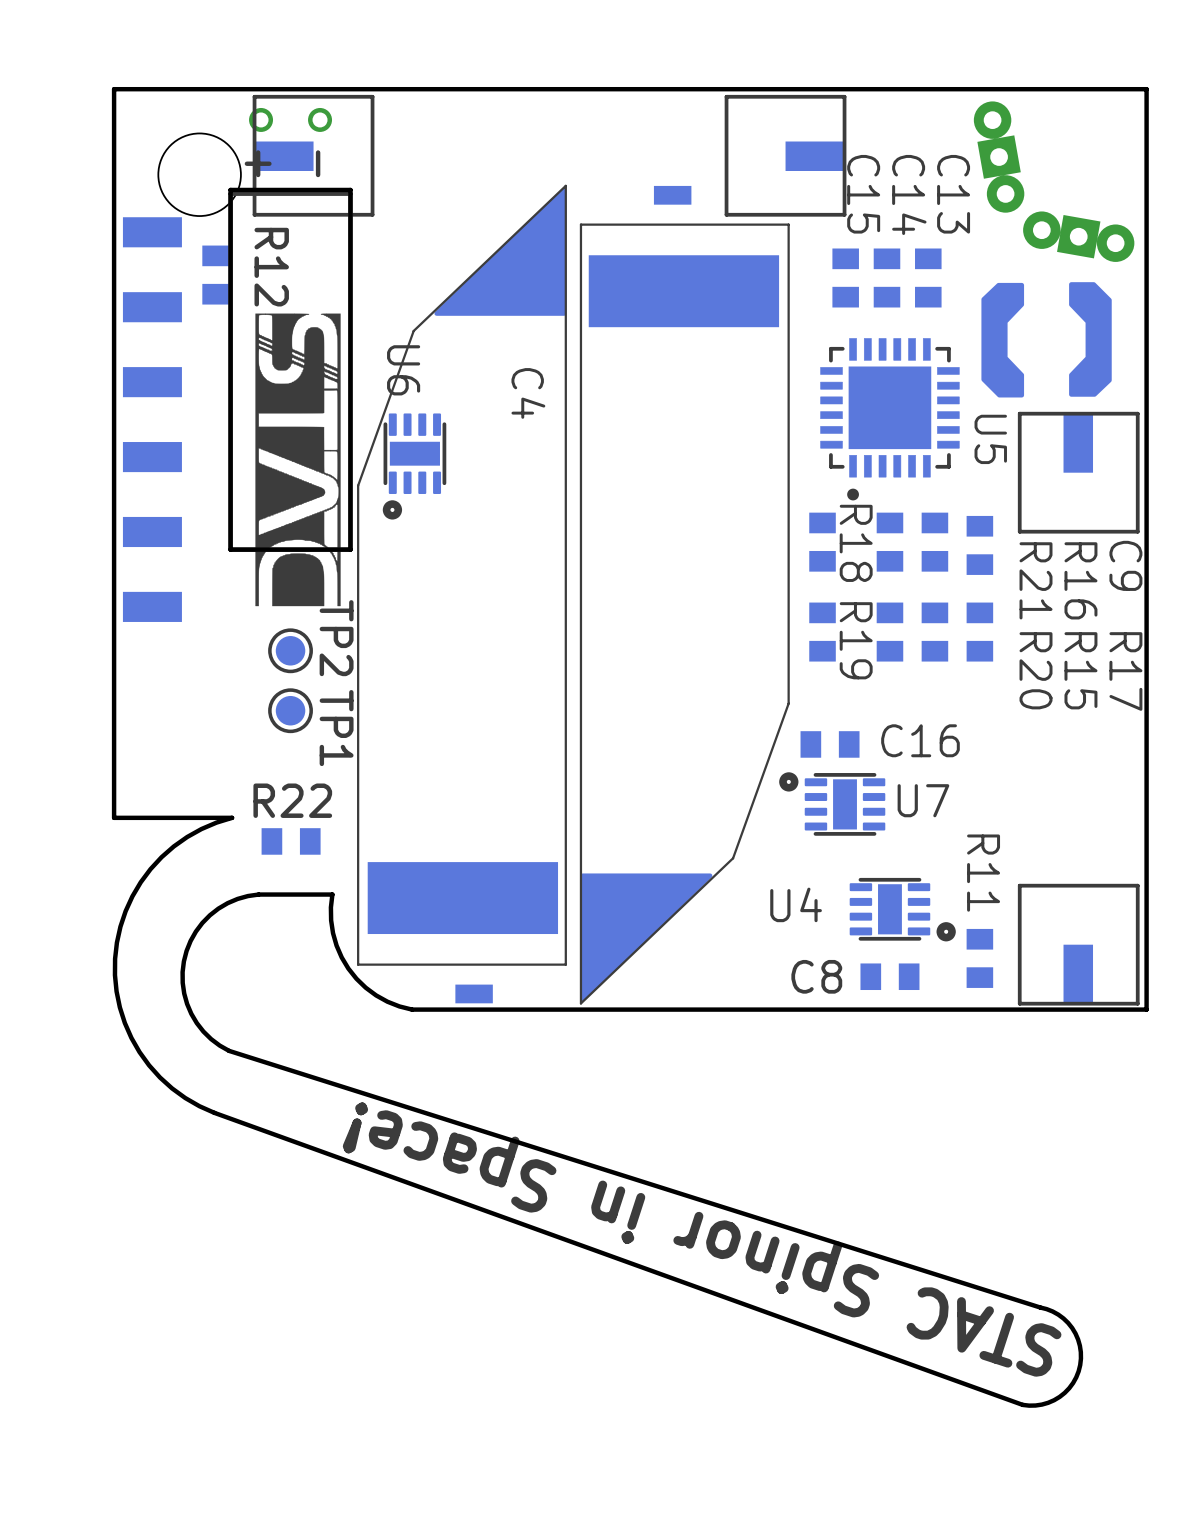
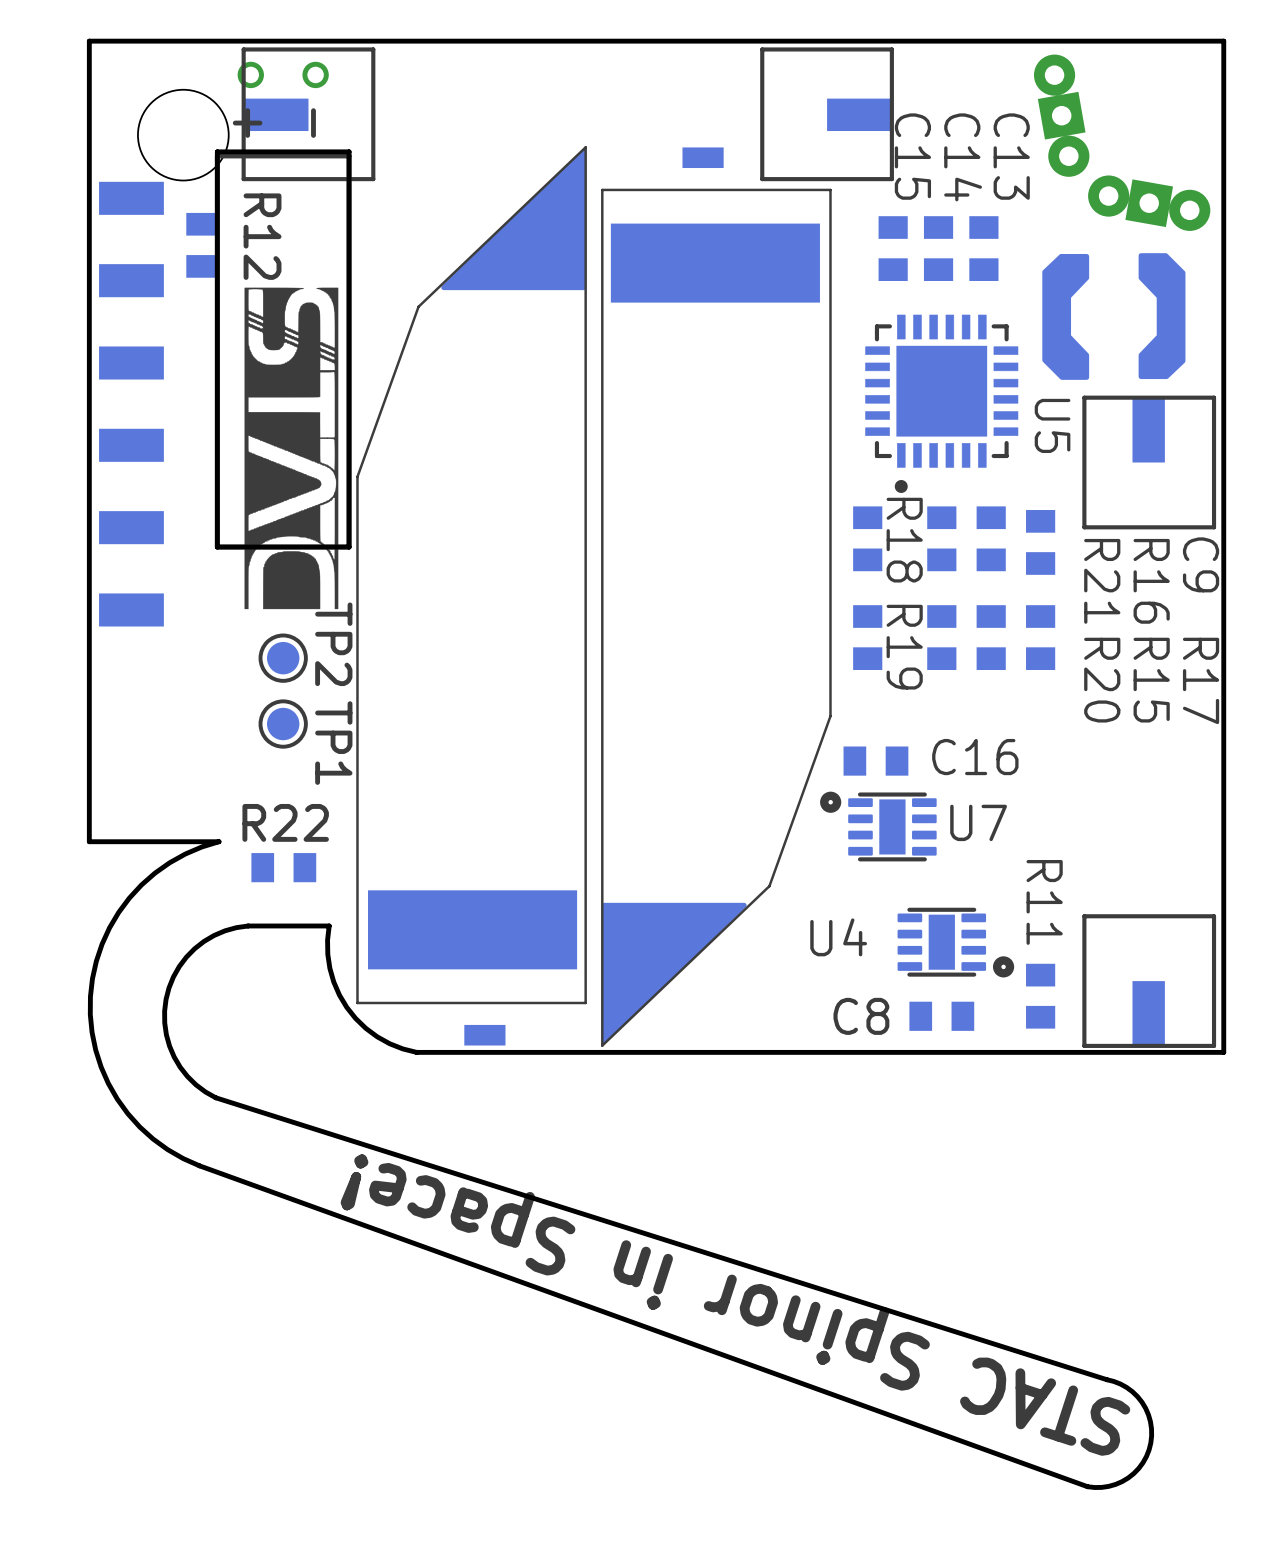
C4: (528, 393) -> none
U6: (414, 466) -> none

